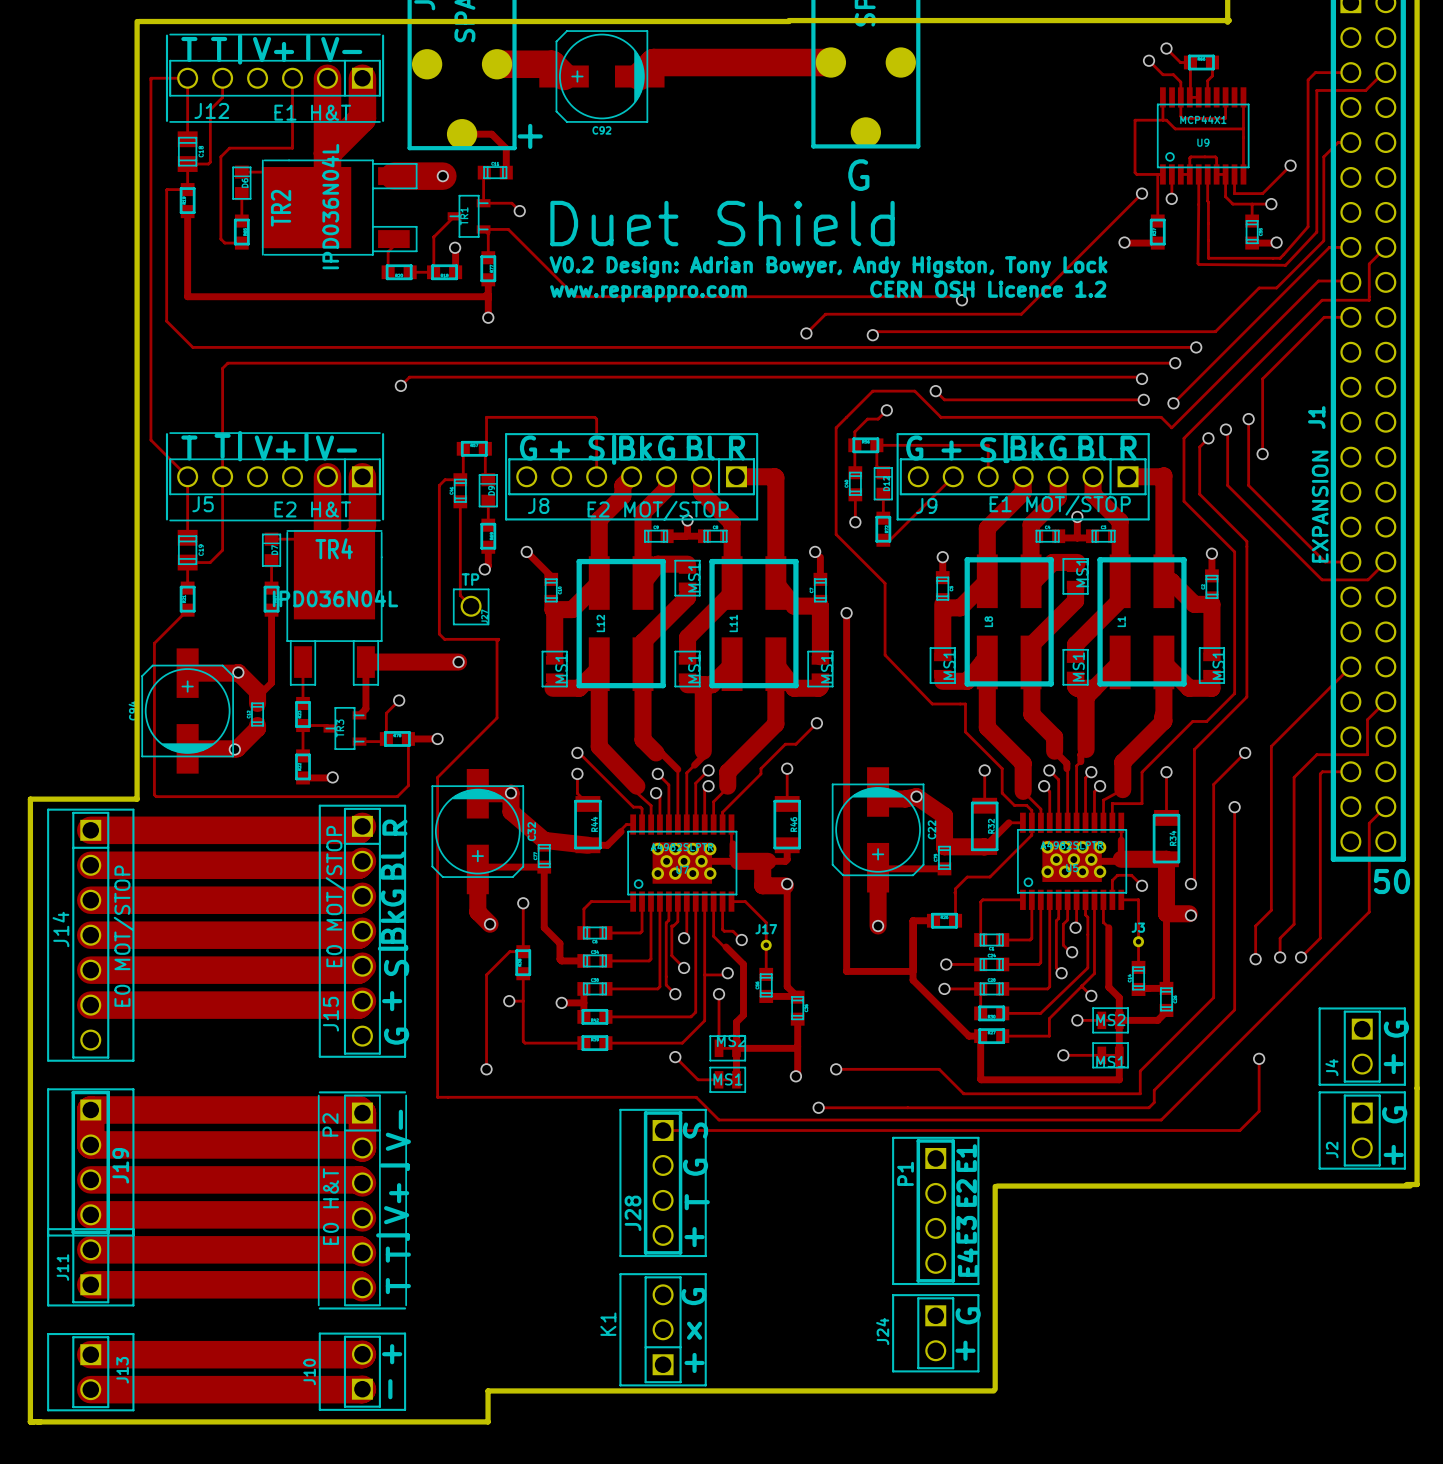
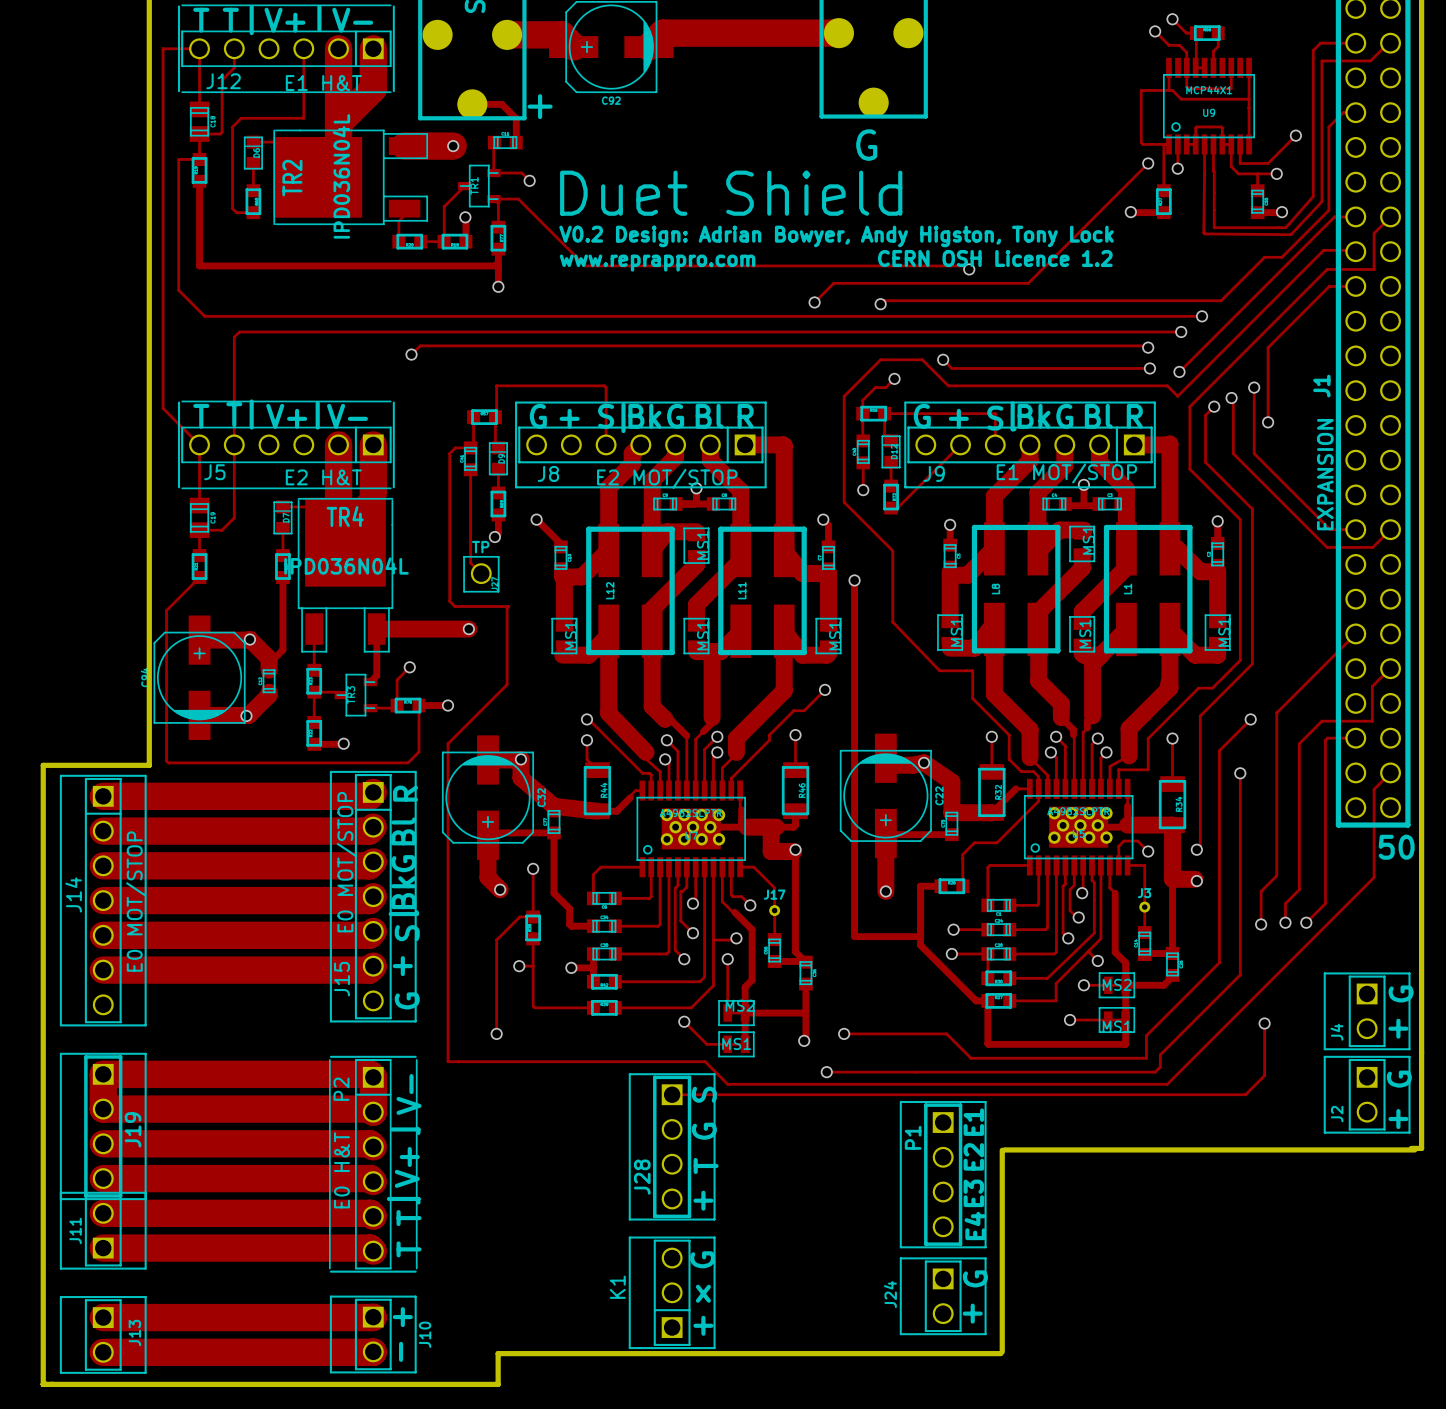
J10 rotation: 0° (362, 1371) -> 180° (373, 1334)

